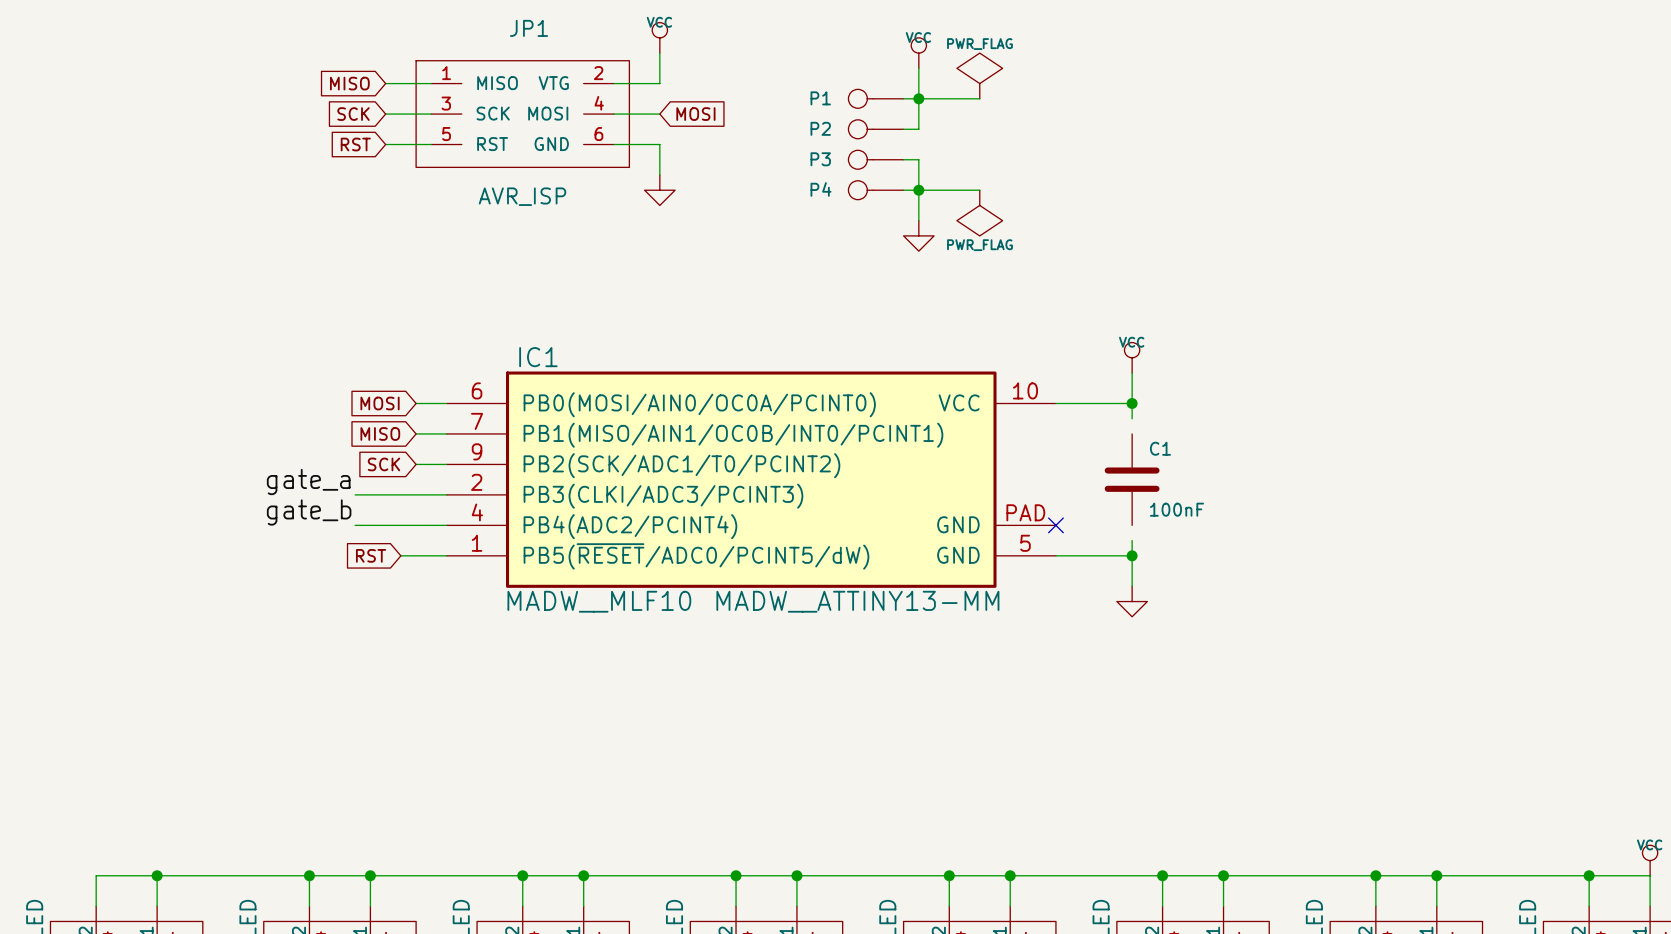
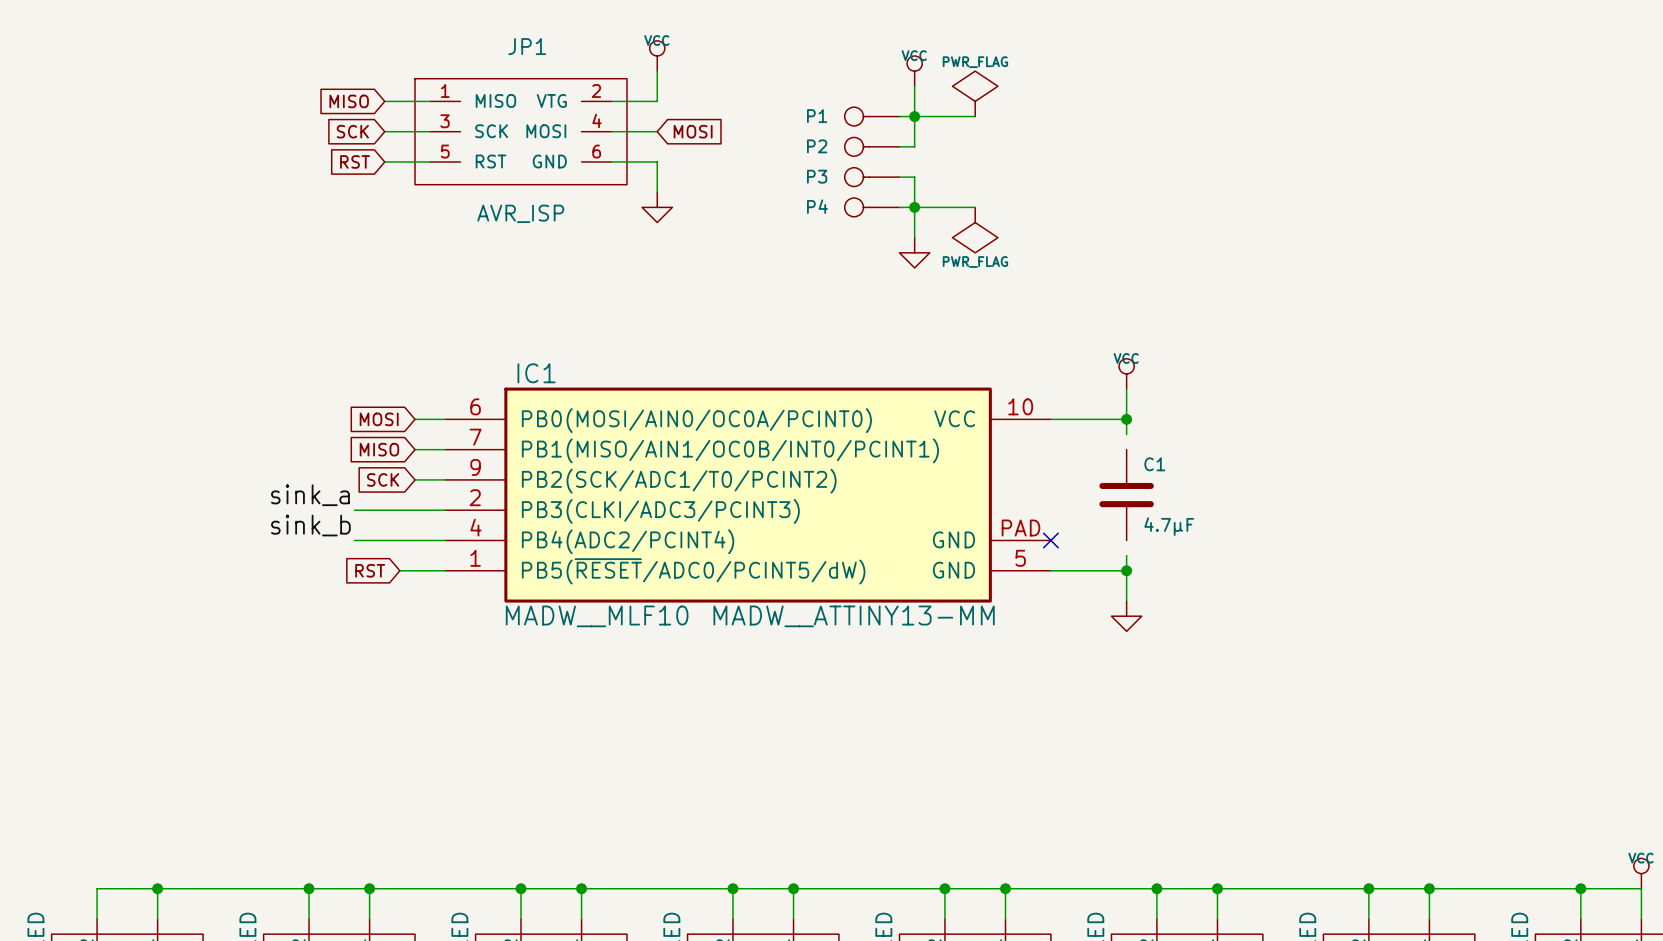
label: gate_a (308, 482) -> sink_a (310, 495)
C1 value: 100nF (1176, 509) -> 4.7µF (1169, 526)
label: gate_b (309, 512) -> sink_b (310, 525)

